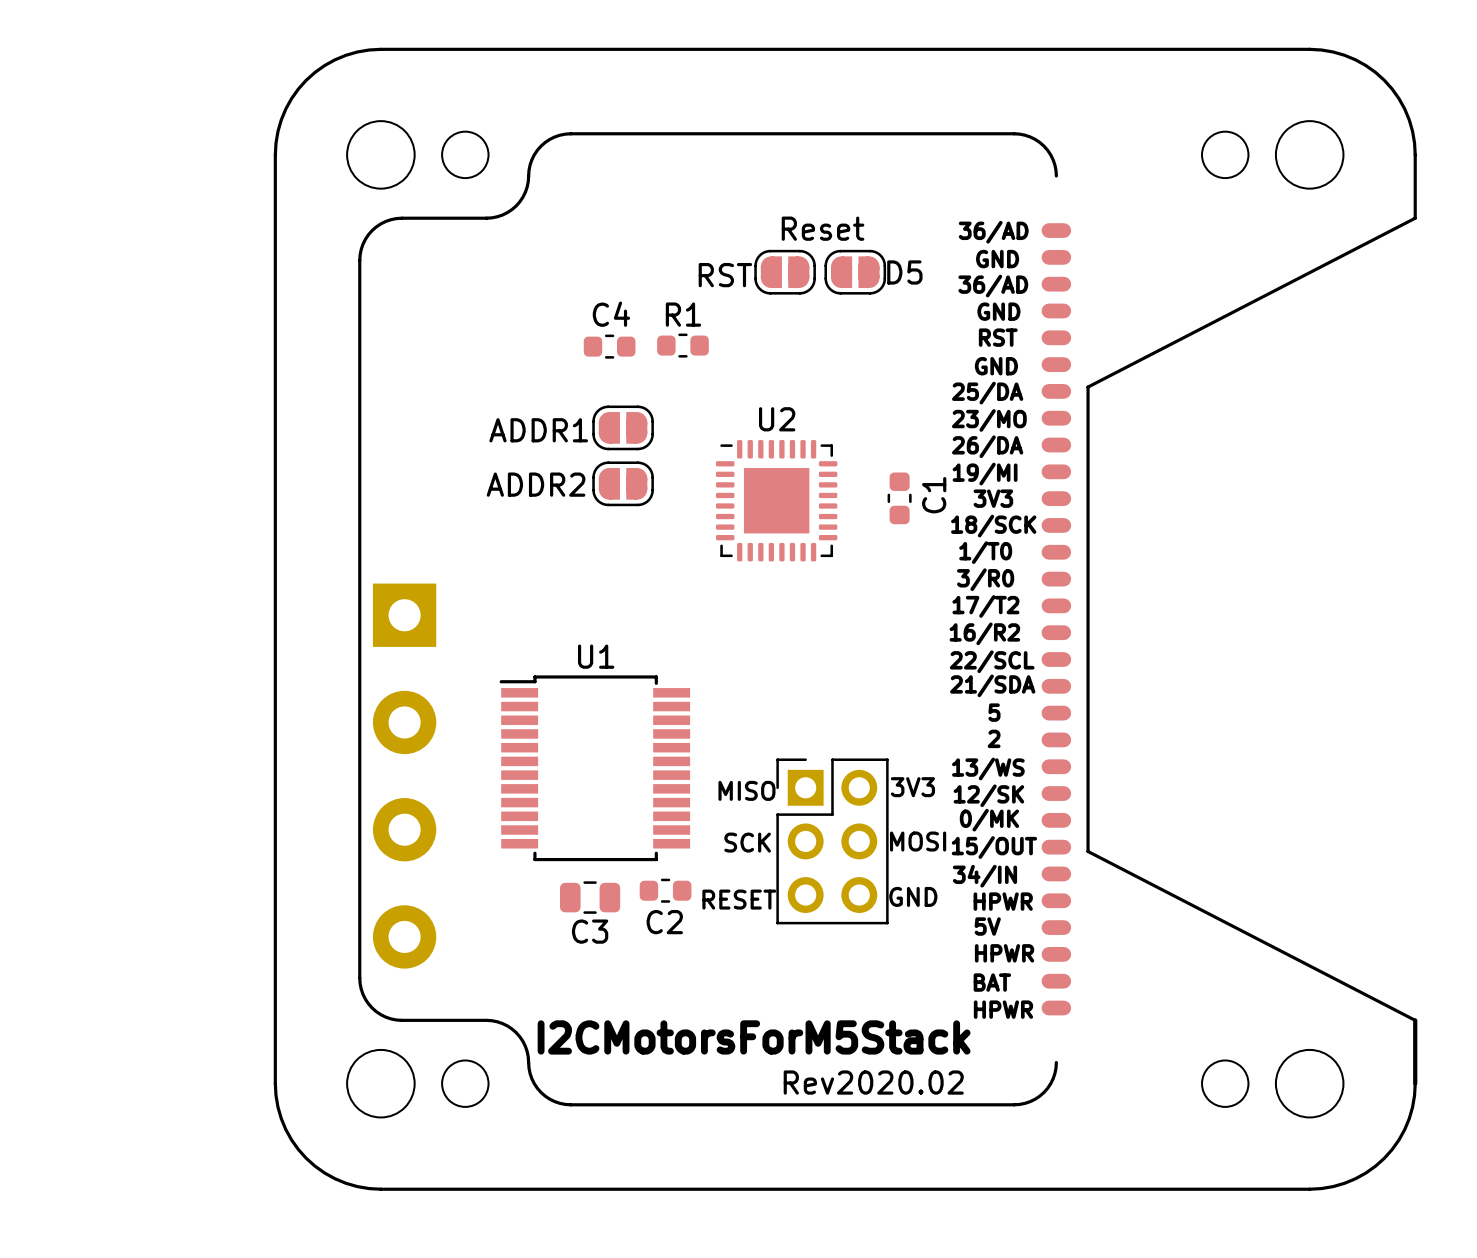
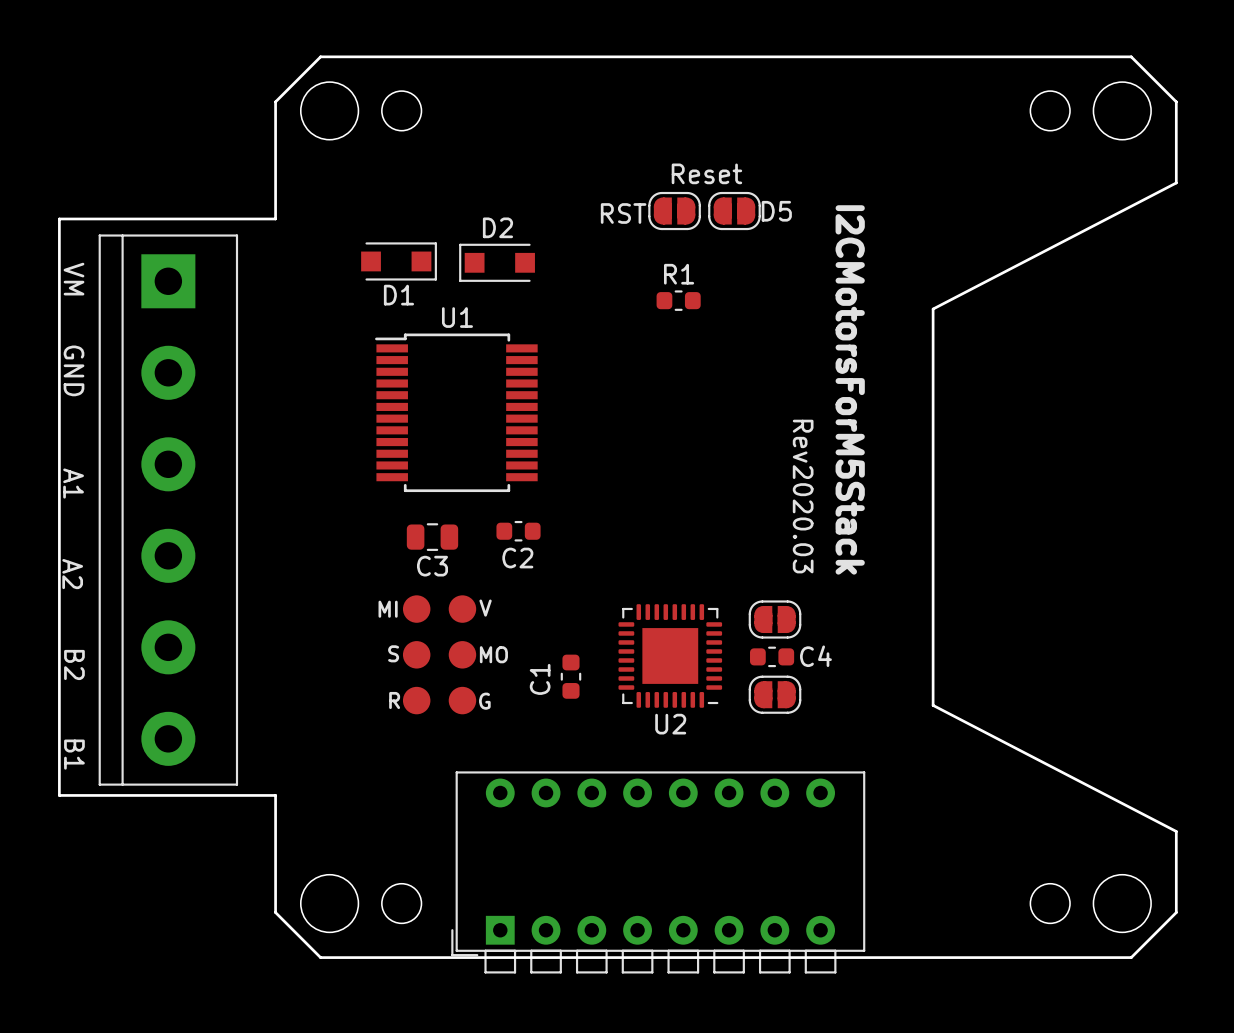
drawing: [273, 47, 383, 157] -> none
drawing: [1308, 47, 1417, 157] -> none
board edge: (380, 49) (1309, 49) -> none
board edge: (275, 154) (275, 1083) -> none
board edge: (1415, 154) (1415, 218) (1088, 387) -> (933, 705) (1176, 831) (1176, 912) (1131, 957) (320, 957) (275, 912) (275, 795) (59, 795) (59, 218) (275, 218) (275, 101) (320, 56) (1131, 56) (1176, 101) (1176, 182) (933, 309)
line: (1056, 175) (1053, 159) (1044, 146) (1035, 139) (1019, 134) (565, 134) (549, 139) (537, 150) (530, 165) (525, 192) (516, 205) (507, 212) (486, 218) (391, 219) (376, 226) (368, 234) (362, 244) (359, 260) (359, 978) (362, 994) (368, 1003) (380, 1014) (396, 1020) (486, 1020) (507, 1026) (519, 1036) (525, 1046) (530, 1073) (537, 1088) (549, 1099) (565, 1104) (1019, 1104) (1035, 1099) (1044, 1092) (1053, 1078) (1056, 1062) -> none
text: 36/AD (993, 232) -> none
text: GND (997, 259) -> none
text: 36/AD (993, 286) -> none
text: GND (998, 311) -> none
C4 name position: C4 (611, 314) -> C4 (815, 656)
D1: none -> (399, 261)
D2: none -> (497, 262)
text: RST (998, 337) -> none
R1 position: (682, 345) -> (678, 300)
C4 position: (609, 346) -> (772, 656)
text: none -> VM (74, 279)
text: GND (996, 366) -> none
text: 25/DA (987, 393) -> none
text: 23/MO (989, 420) -> none
part: (623, 427) -> none
text: ADDR1 (538, 430) -> none
text: 26/DA (987, 446) -> none
text: none -> GND (74, 370)
text: 19/MI (985, 474) -> none
text: none -> I2CMotorsForM5Stack (850, 389)
part: (623, 483) -> none
text: ADDR2 (536, 484) -> none
C1 name position: C1 (934, 495) -> C1 (540, 679)
C1 position: (899, 498) -> (570, 676)
text: 3V3 (993, 498) -> none
U2 rotation: 0° (776, 500) -> 180° (670, 655)
U2 position: (776, 500) -> (670, 655)
text: 18/SCK (993, 526) -> none
text: 1/T0 (985, 552) -> none
text: 3/R0 (985, 579) -> none
text: none -> A1 (73, 483)
text: none -> Rev2020.03 (803, 496)
text: 17/T2 (985, 606) -> none
part: (1056, 619) -> none
part: none -> (168, 510)
text: 16/R2 (984, 633) -> none
text: 22/SCL (992, 661) -> none
text: 21/SDA (992, 685) -> none
text: none -> A2 (72, 574)
text: 5 (994, 712) -> none
text: 2 (994, 738) -> none
part: none -> (775, 619)
U1 position: (594, 768) -> (456, 412)
text: 13/WS (988, 768) -> none
part: (404, 776) -> none
text: 3V3 (912, 787) -> none
text: MISO (746, 790) -> none
part: none -> (439, 654)
text: 12/SK (988, 795) -> none
text: none -> B2 (74, 664)
text: 0/MK (989, 820) -> none
part: none -> (775, 694)
part: (832, 841) -> none
text: MOSI (918, 841) -> none
text: SCK (747, 842) -> none
text: 15/OUT (994, 847) -> none
board edge: (1088, 851) (1415, 1020) (1415, 1083) -> none
text: 34/IN (984, 876) -> none
C2 position: (665, 890) -> (518, 531)
text: GND (913, 896) -> none
C3 position: (590, 897) -> (432, 537)
text: RESET (739, 899) -> none
text: HPWR (1003, 901) -> none
text: none -> B1 (74, 754)
text: 5V (987, 926) -> none
text: HPWR (1004, 953) -> none
text: BAT (992, 982) -> none
text: HPWR (1003, 1009) -> none
text: I2CMotorsForM5Stack (754, 1037) -> none
part: none -> (658, 872)
drawing: [273, 1082, 383, 1191] -> none
text: Rev2020.02 (873, 1082) -> none
drawing: [1308, 1082, 1417, 1191] -> none
board edge: (380, 1189) (1309, 1189) -> none

